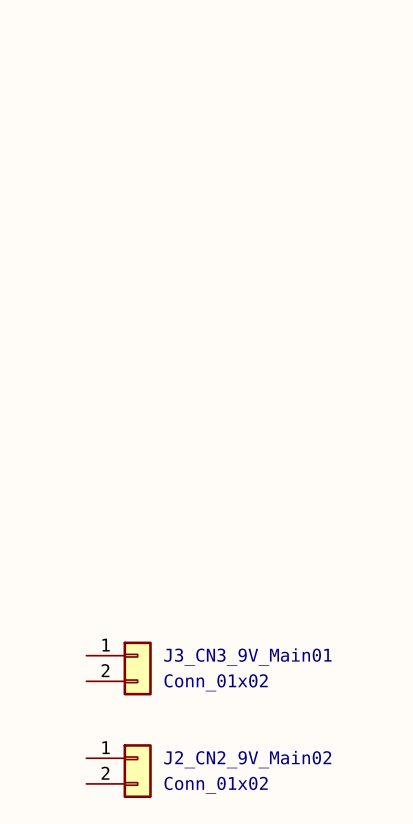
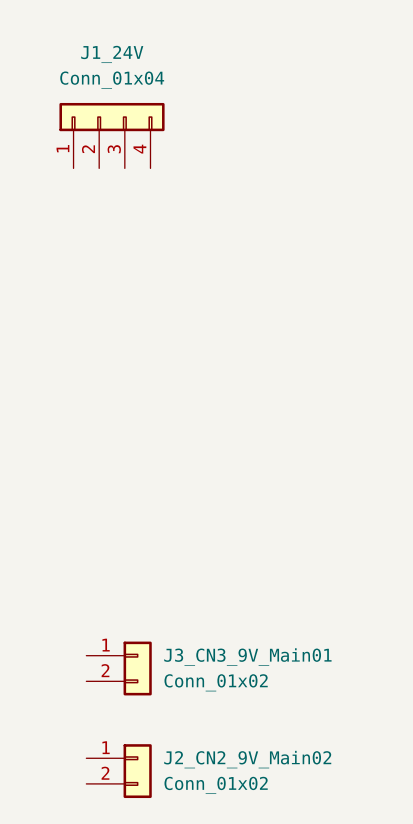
J1_24V: none -> Conn_01x04 (112, 135)

